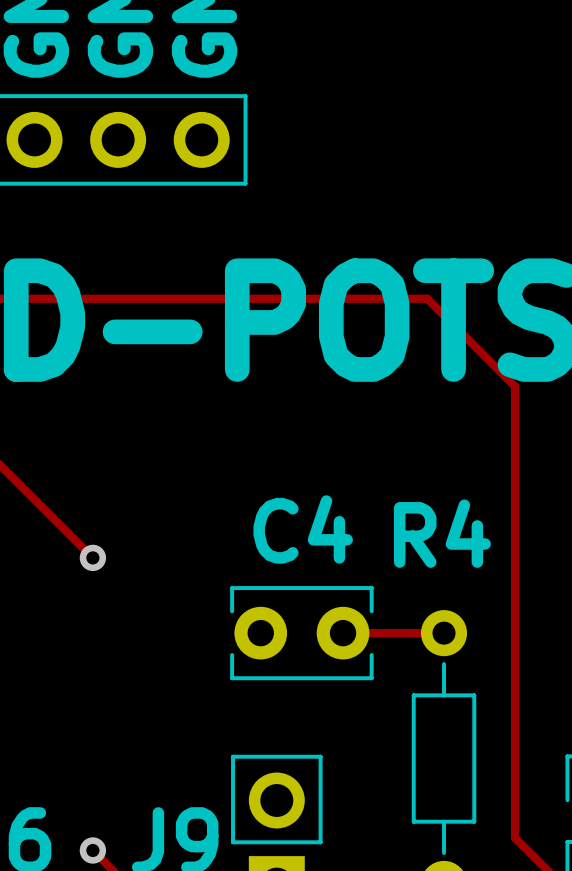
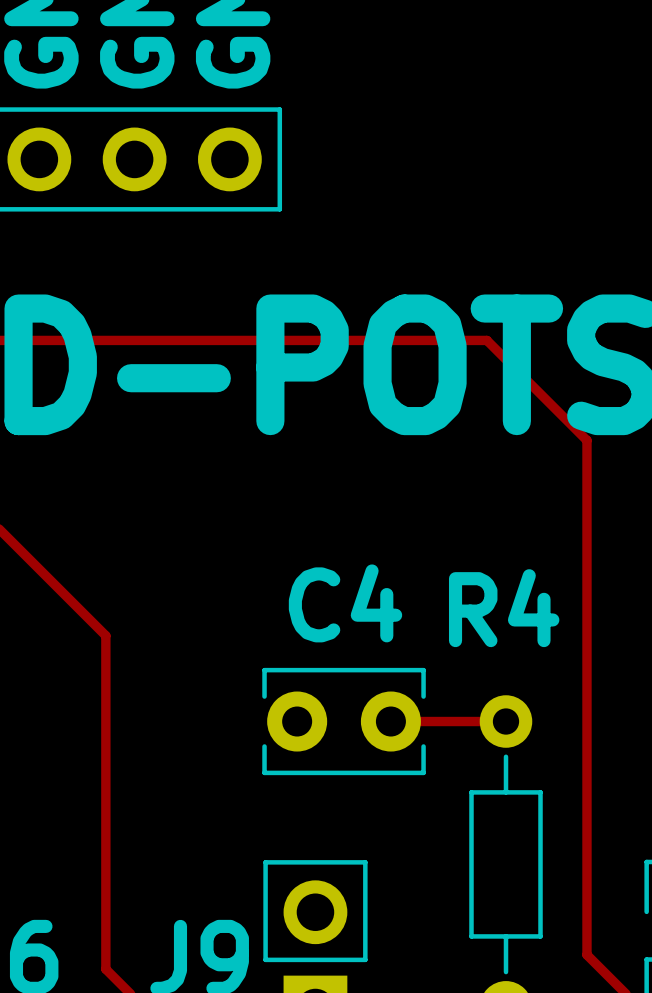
track: none -> (105, 635) (105, 969)
via: (92, 557) -> none
via: (92, 850) -> none

